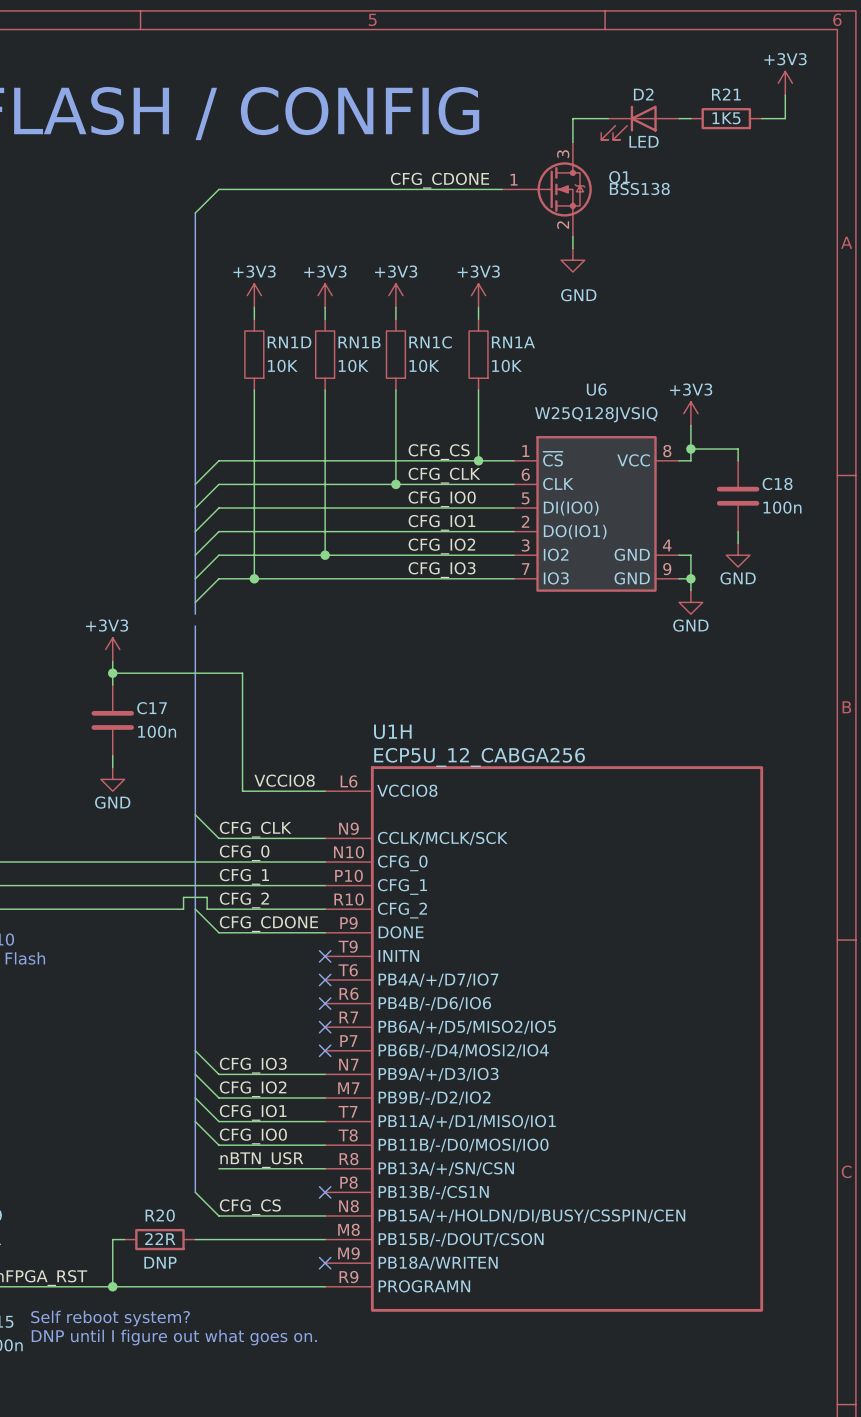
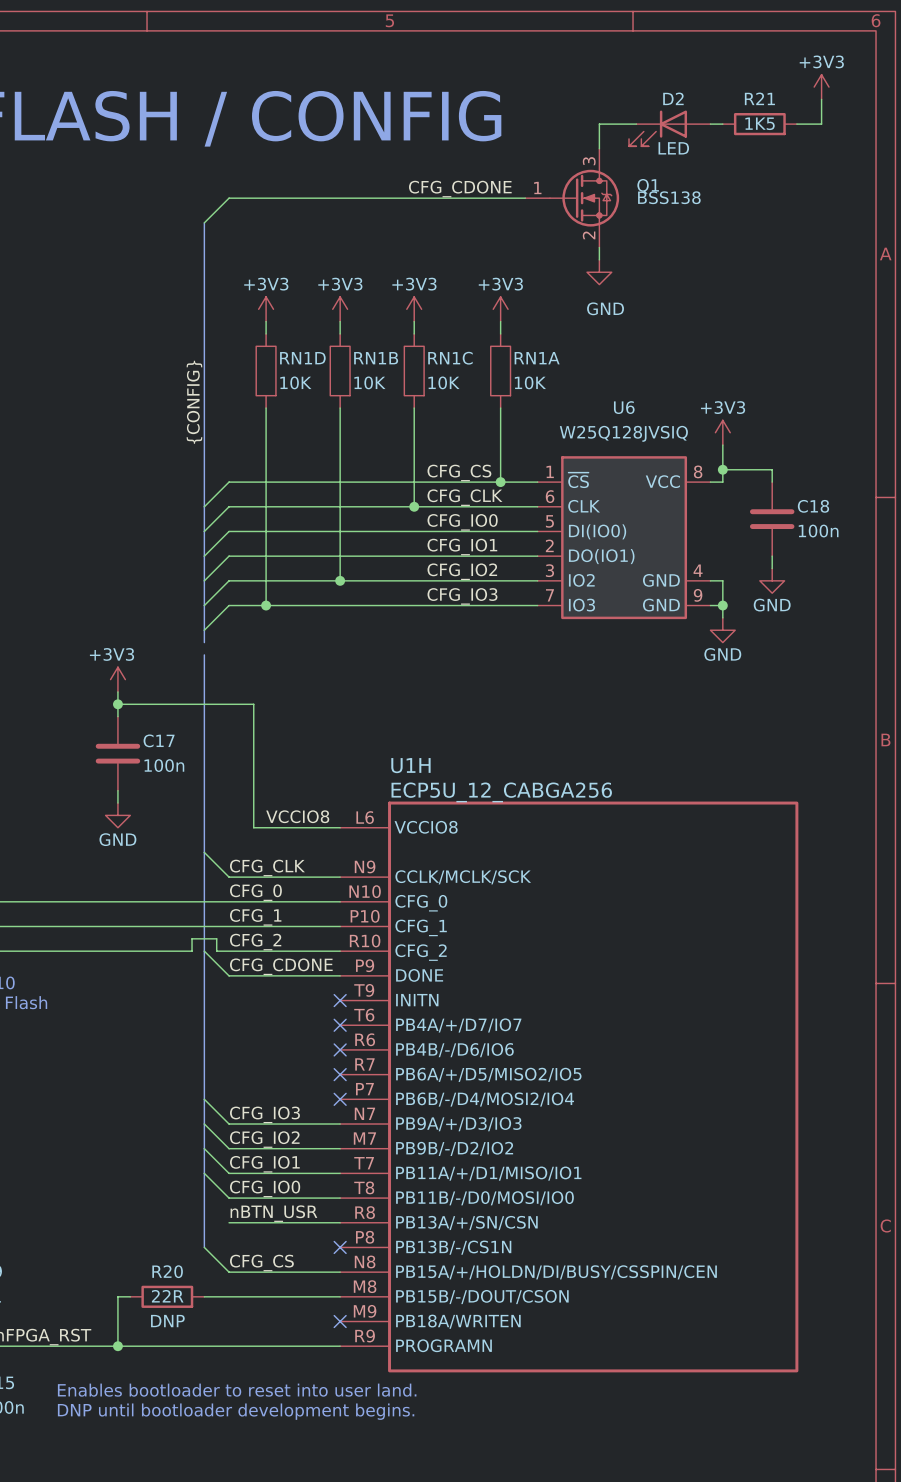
label: none -> {CONFIG} (194, 402)
text: Self reboot system? (110, 1318) -> none
text: none -> Enables bootloader to reset into user land. (237, 1390)
text: DNP until I figure out what goes on. (174, 1337) -> none
text: none -> DNP until bootloader development begins. (236, 1411)

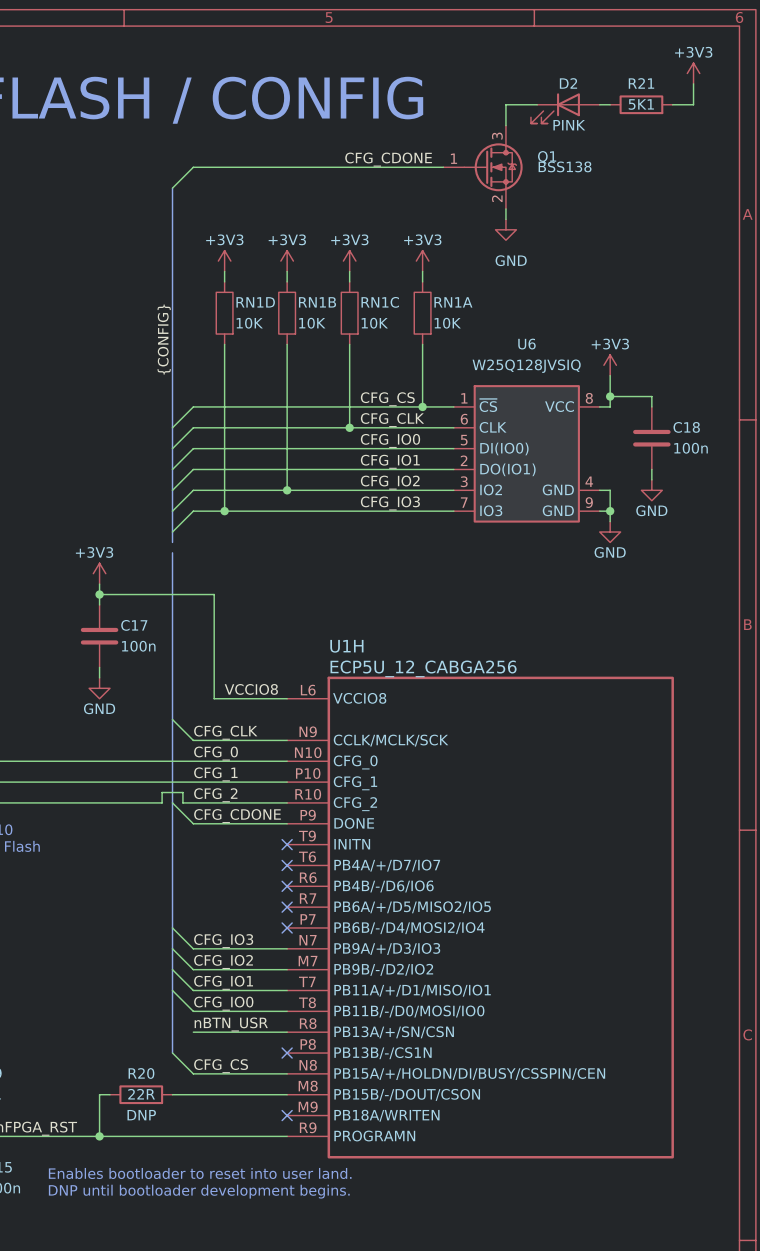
R21 value: 1K5 (760, 123) -> 5K1 (641, 104)
D2 value: LED (673, 148) -> PINK (569, 125)

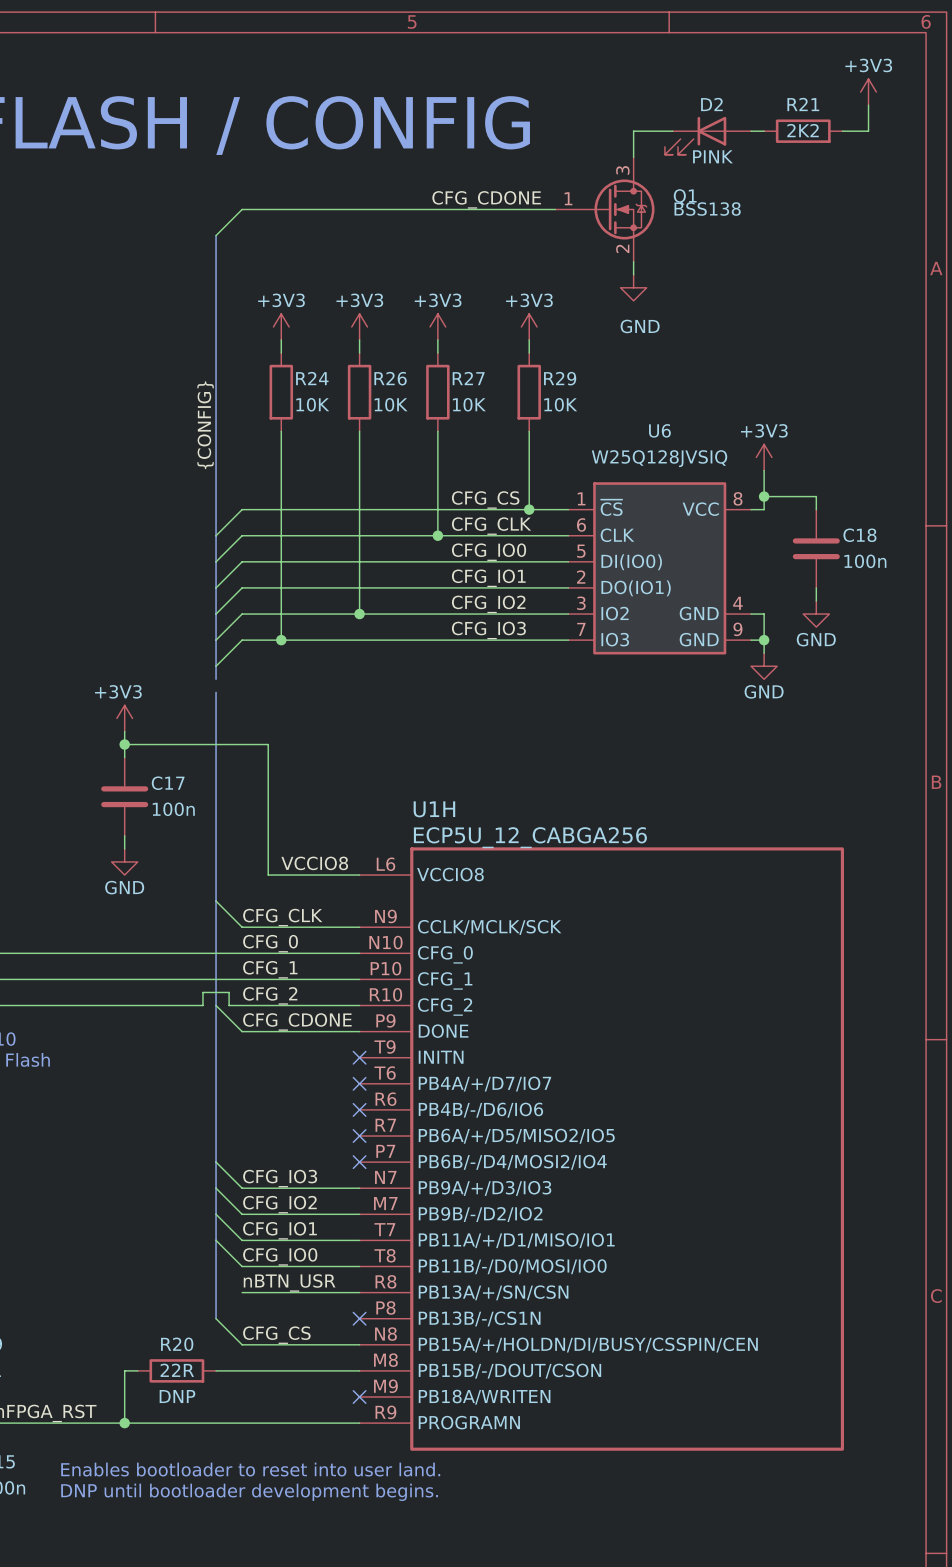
R21 value: 5K1 (641, 104) -> 2K2 (803, 130)
RN1D: 10K (224, 313) -> none
R24: none -> 10K (281, 392)
RN1B: 10K (287, 313) -> none
R26: none -> 10K (359, 392)
RN1C: 10K (349, 313) -> none
R27: none -> 10K (437, 392)
RN1A: 10K (422, 313) -> none
R29: none -> 10K (529, 392)

